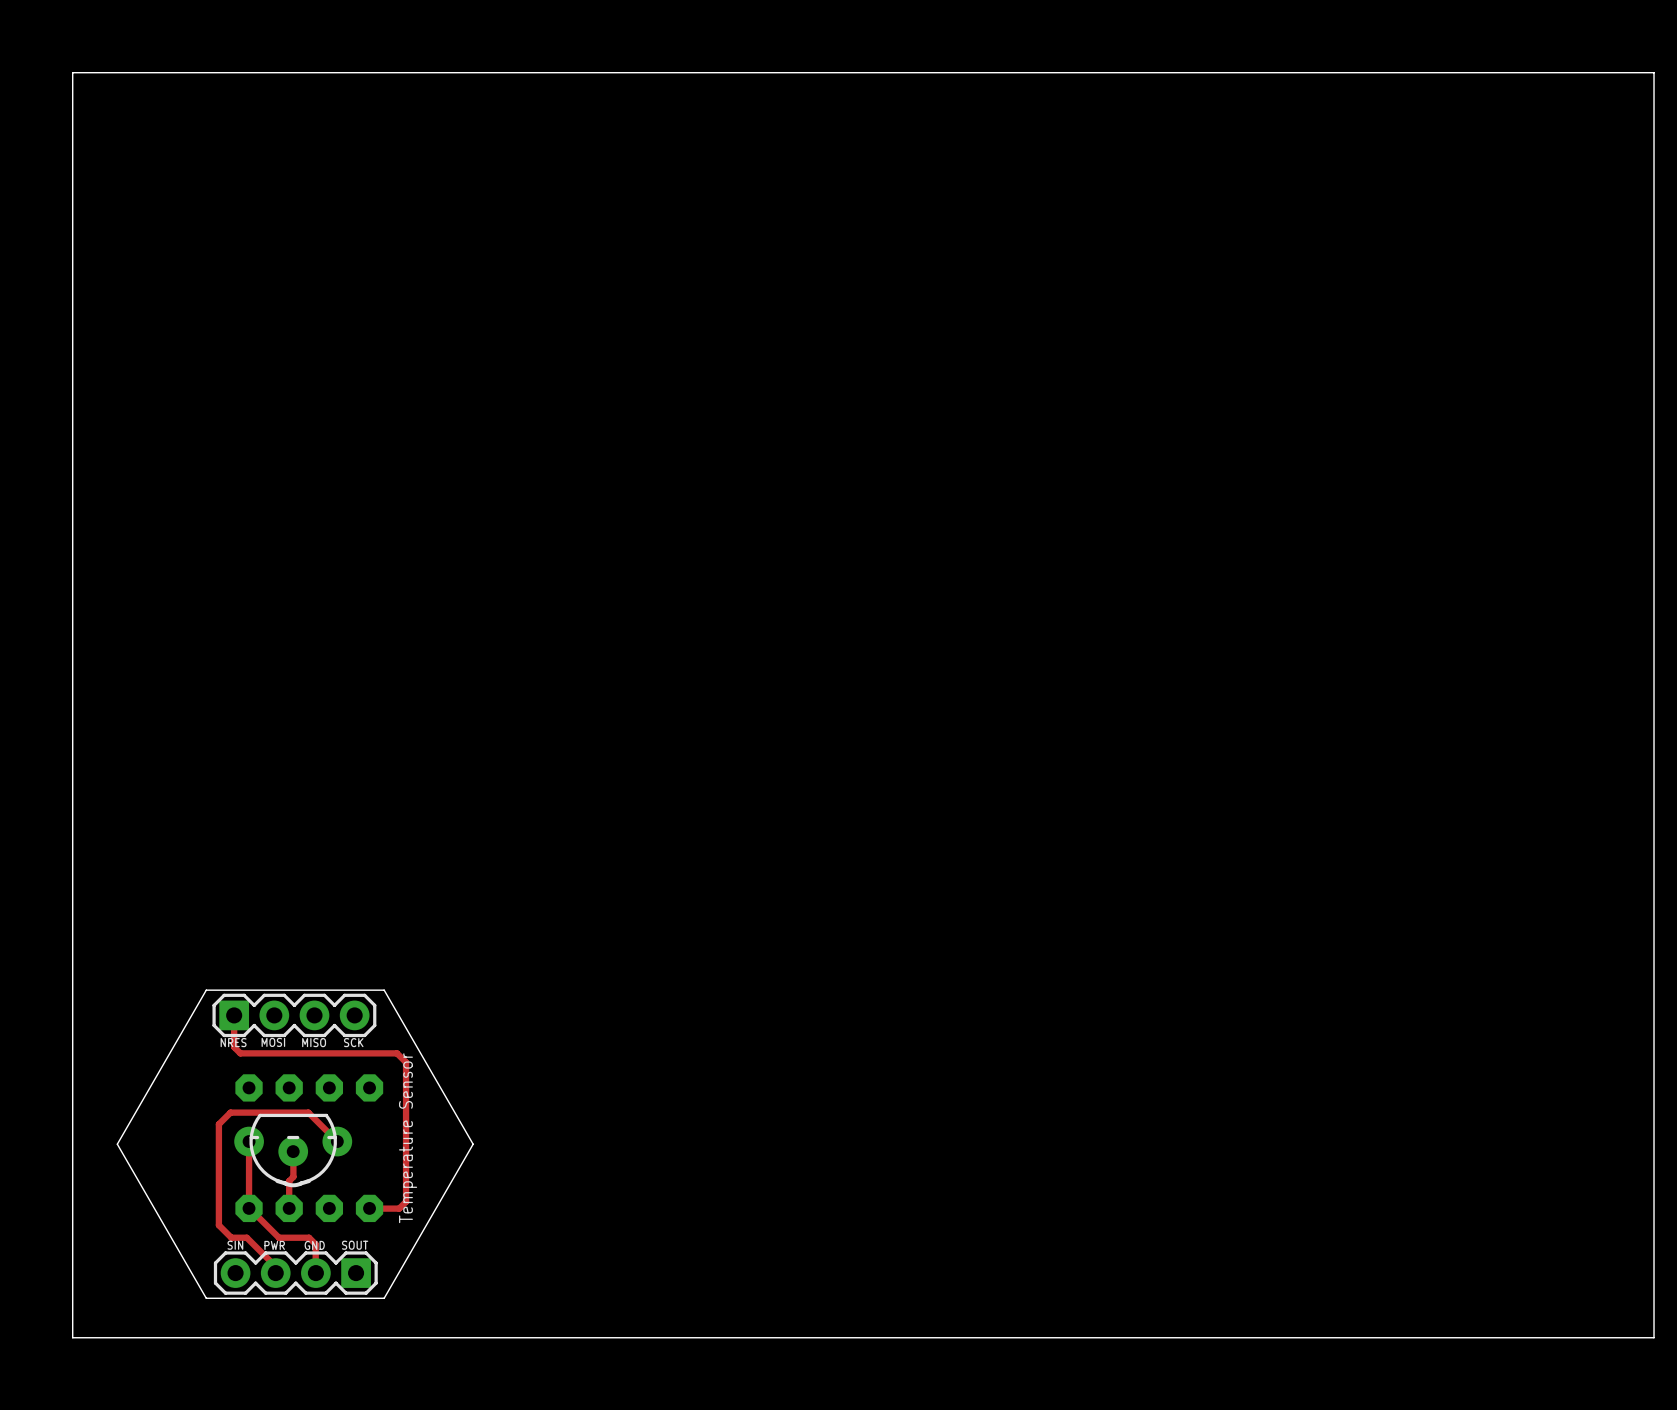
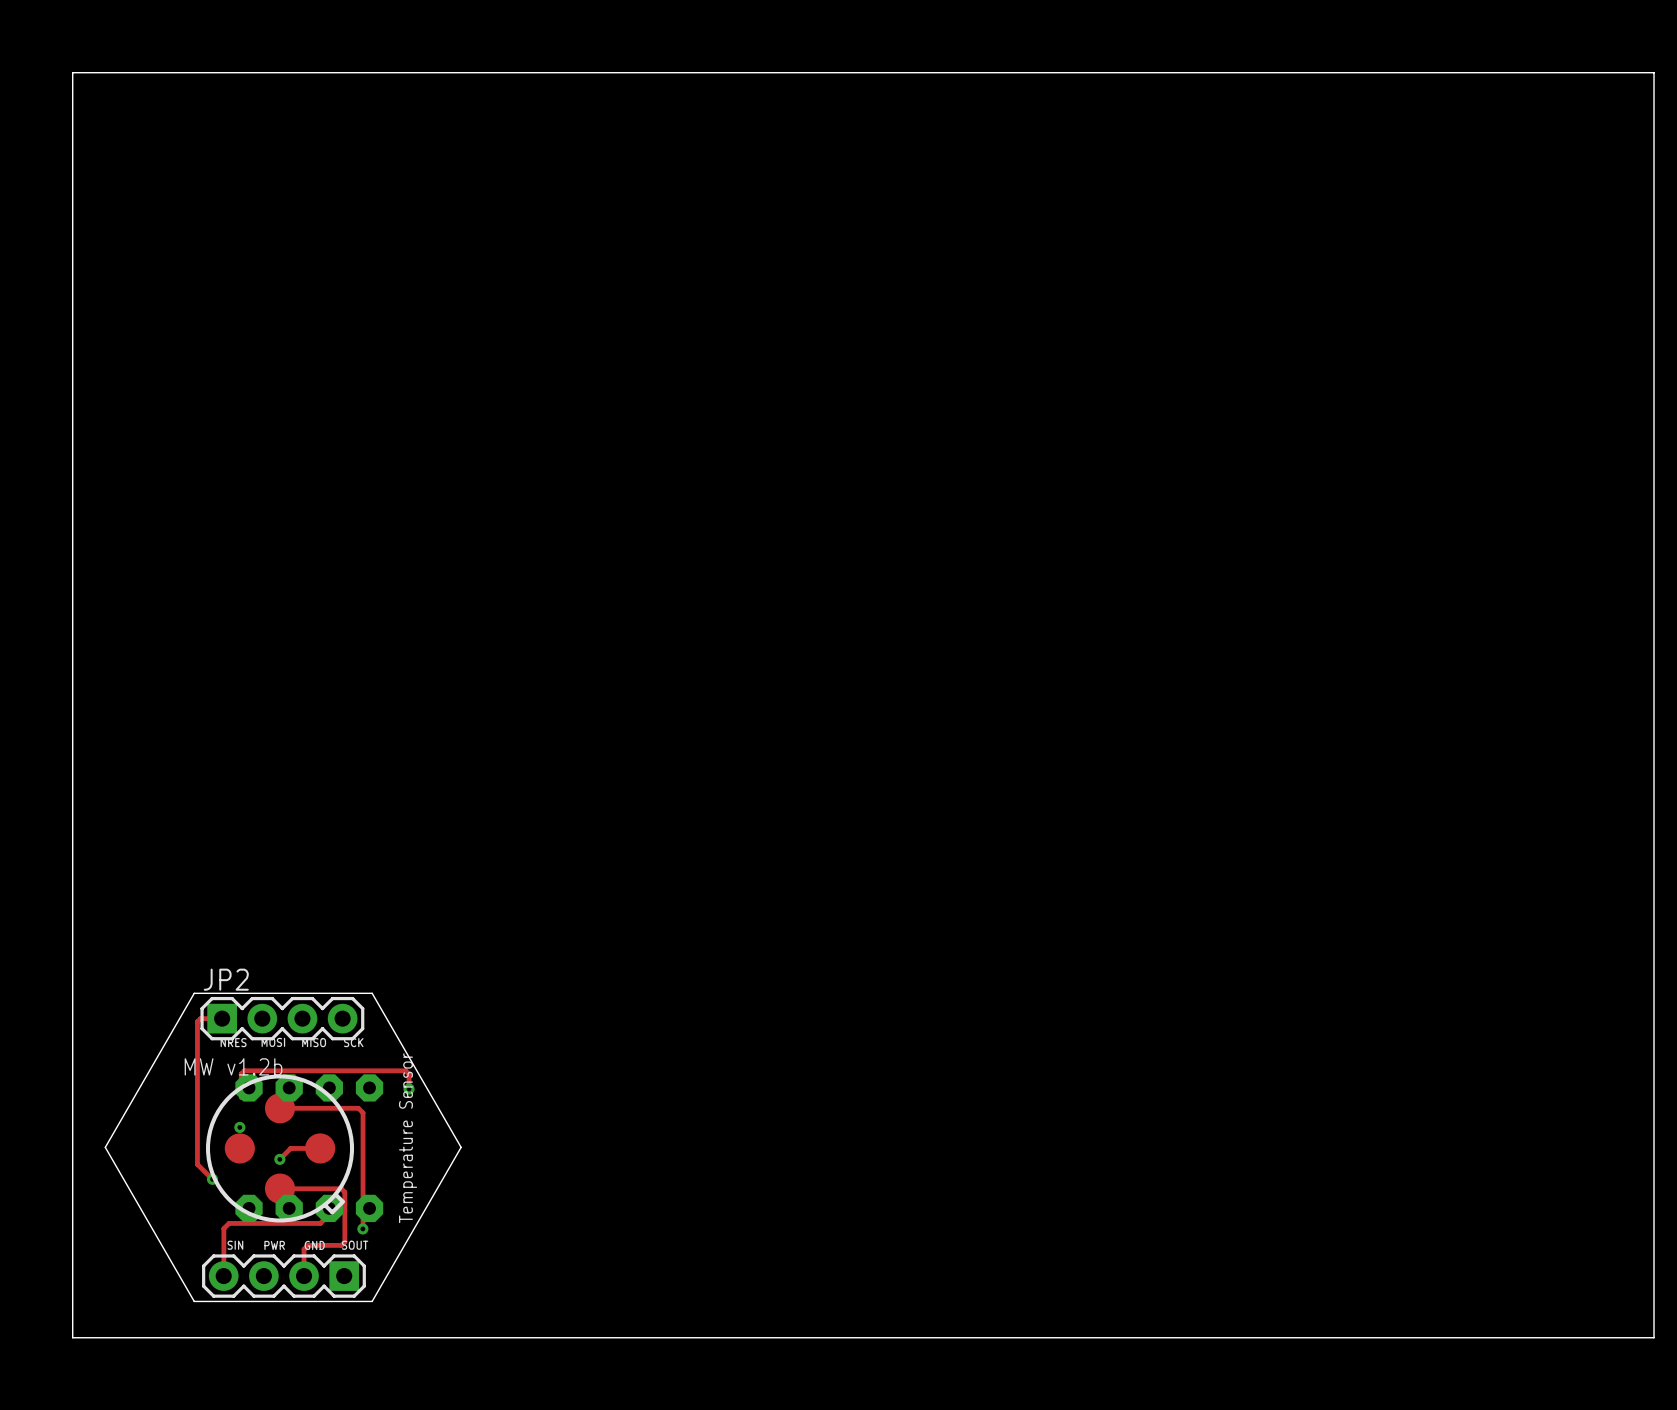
JP2 name: none -> JP2 (226, 979)
board edge: (206, 990) (384, 990) (473, 1144) (384, 1298) (206, 1298) (117, 1144) (206, 990) -> (194, 993) (372, 993) (461, 1147) (372, 1301) (194, 1301) (105, 1147) (194, 993)
track: (234, 1015) (234, 1047) (240, 1053) (397, 1053) (406, 1062) (406, 1201) (399, 1208) (369, 1208) -> none
JP2 position: (294, 1015) -> (282, 1018)
track: none -> (222, 1018) (200, 1018) (197, 1021) (197, 1164) (212, 1179)
text: none -> MW v1.2b (233, 1066)
track: none -> (409, 1089) (409, 1074) (405, 1070) (244, 1070) (241, 1073) (241, 1097)
via: none -> (409, 1089)
track: none -> (280, 1108) (358, 1108) (363, 1112) (363, 1228)
part footprint: [234, 1113, 353, 1188] -> [205, 1074, 355, 1223]
via: none -> (239, 1127)
track: (249, 1141) (249, 1208) (278, 1237) (309, 1237) (315, 1244) (315, 1272) -> none
track: (337, 1141) (308, 1112) (230, 1112) (218, 1124) (218, 1225) (231, 1237) (246, 1237) (275, 1266) (275, 1273) -> none
track: none -> (320, 1148) (290, 1148) (279, 1159)
track: (293, 1151) (293, 1176) (289, 1181) (289, 1208) -> none
via: none -> (279, 1159)
via: none -> (212, 1179)
track: none -> (280, 1188) (341, 1188) (344, 1192) (344, 1242) (341, 1245) (308, 1245) (304, 1249) (304, 1276)
track: none -> (324, 1207) (324, 1219) (320, 1223) (229, 1223) (223, 1228) (223, 1275)
via: none -> (362, 1228)
part position: (295, 1273) -> (283, 1276)

